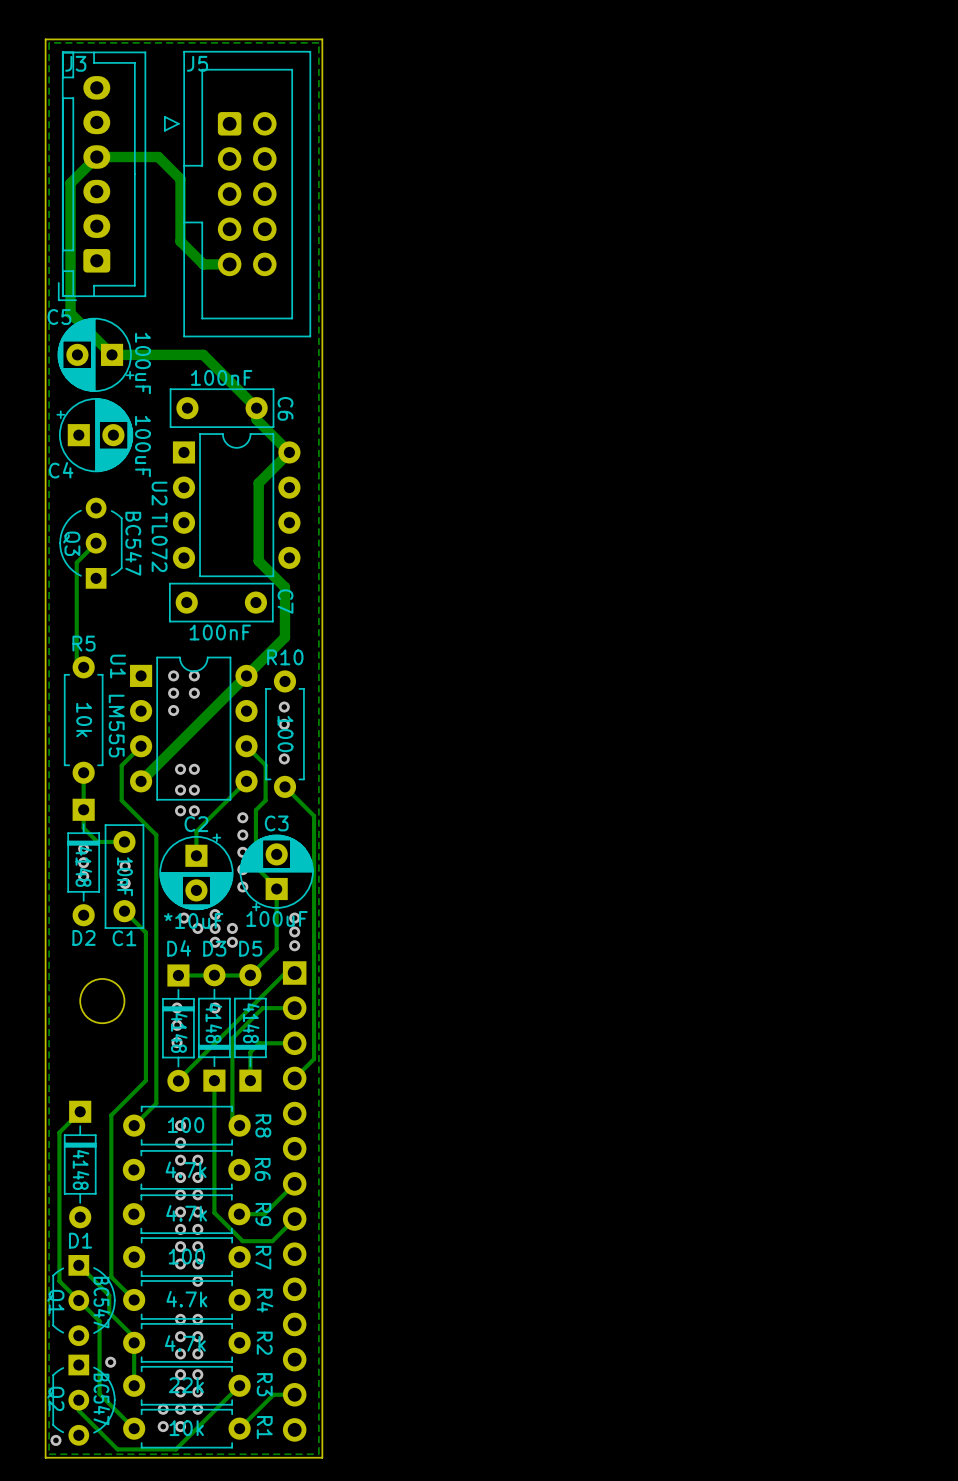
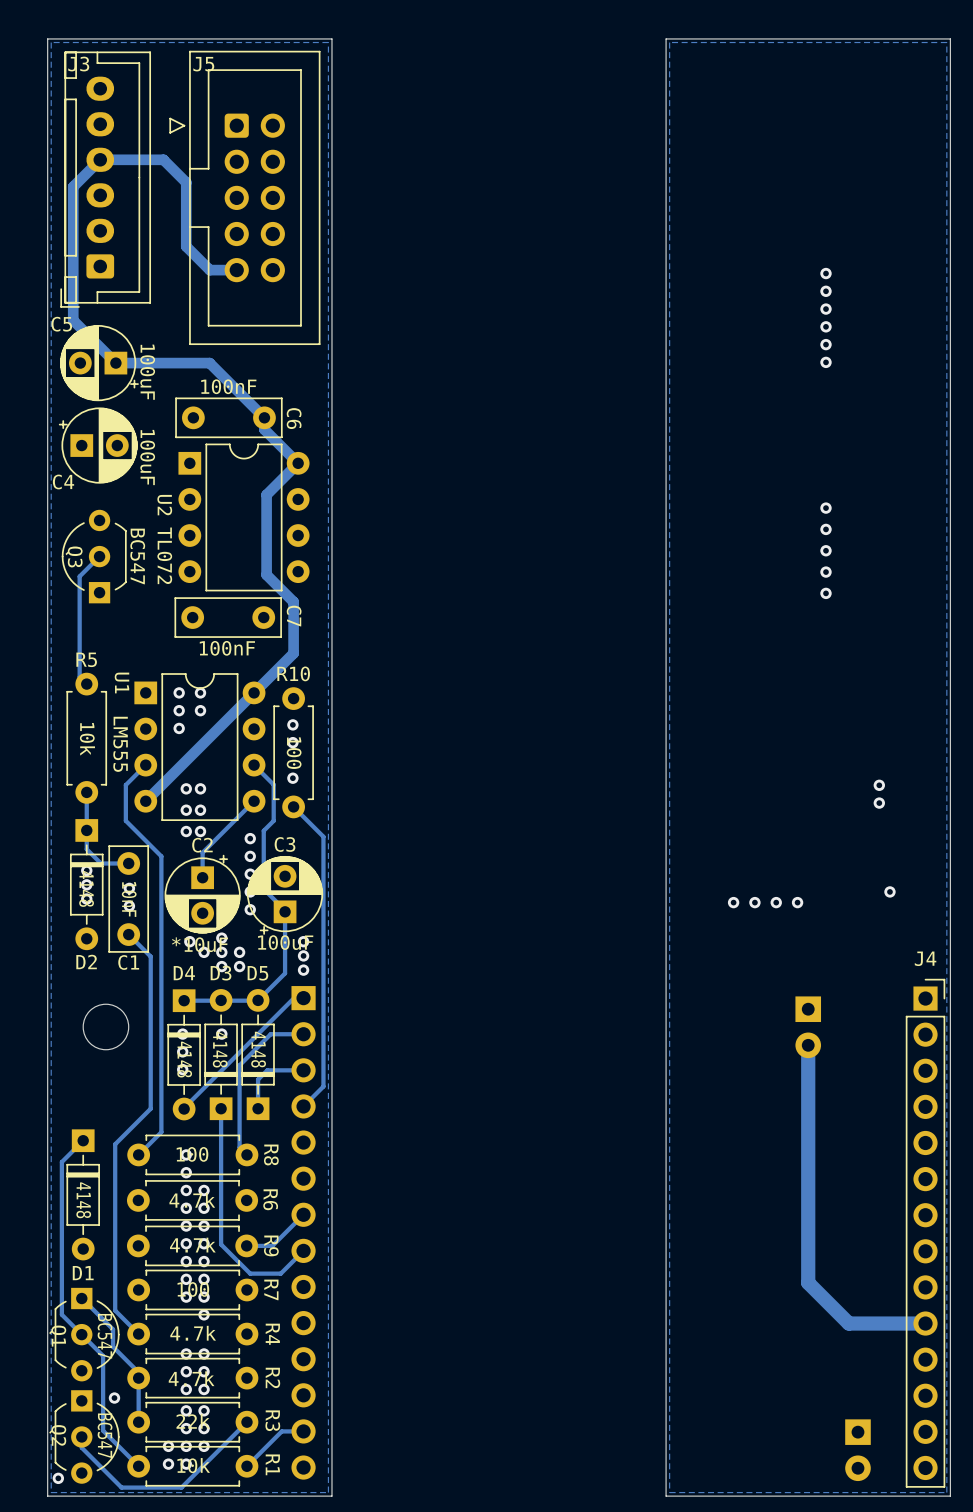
board edge: none -> (950, 38) (950, 1496) (666, 1496) (666, 38) (950, 38)
zone outline: none -> (946, 42) (946, 1492) (669, 1492) (669, 42) (946, 42)
via: none -> (826, 273)
via: none -> (826, 291)
via: none -> (826, 309)
via: none -> (826, 326)
via: none -> (826, 344)
via: none -> (826, 362)
via: none -> (826, 508)
via: none -> (826, 529)
via: none -> (826, 550)
via: none -> (826, 572)
via: none -> (826, 593)
via: none -> (879, 785)
via: none -> (879, 803)
via: none -> (889, 891)
via: none -> (733, 902)
via: none -> (754, 902)
via: none -> (776, 902)
via: none -> (797, 902)
part: none -> (808, 1027)
track: none -> (808, 1045) (808, 1282) (848, 1323) (925, 1323)
J4: none -> (925, 1233)
part: none -> (857, 1450)

